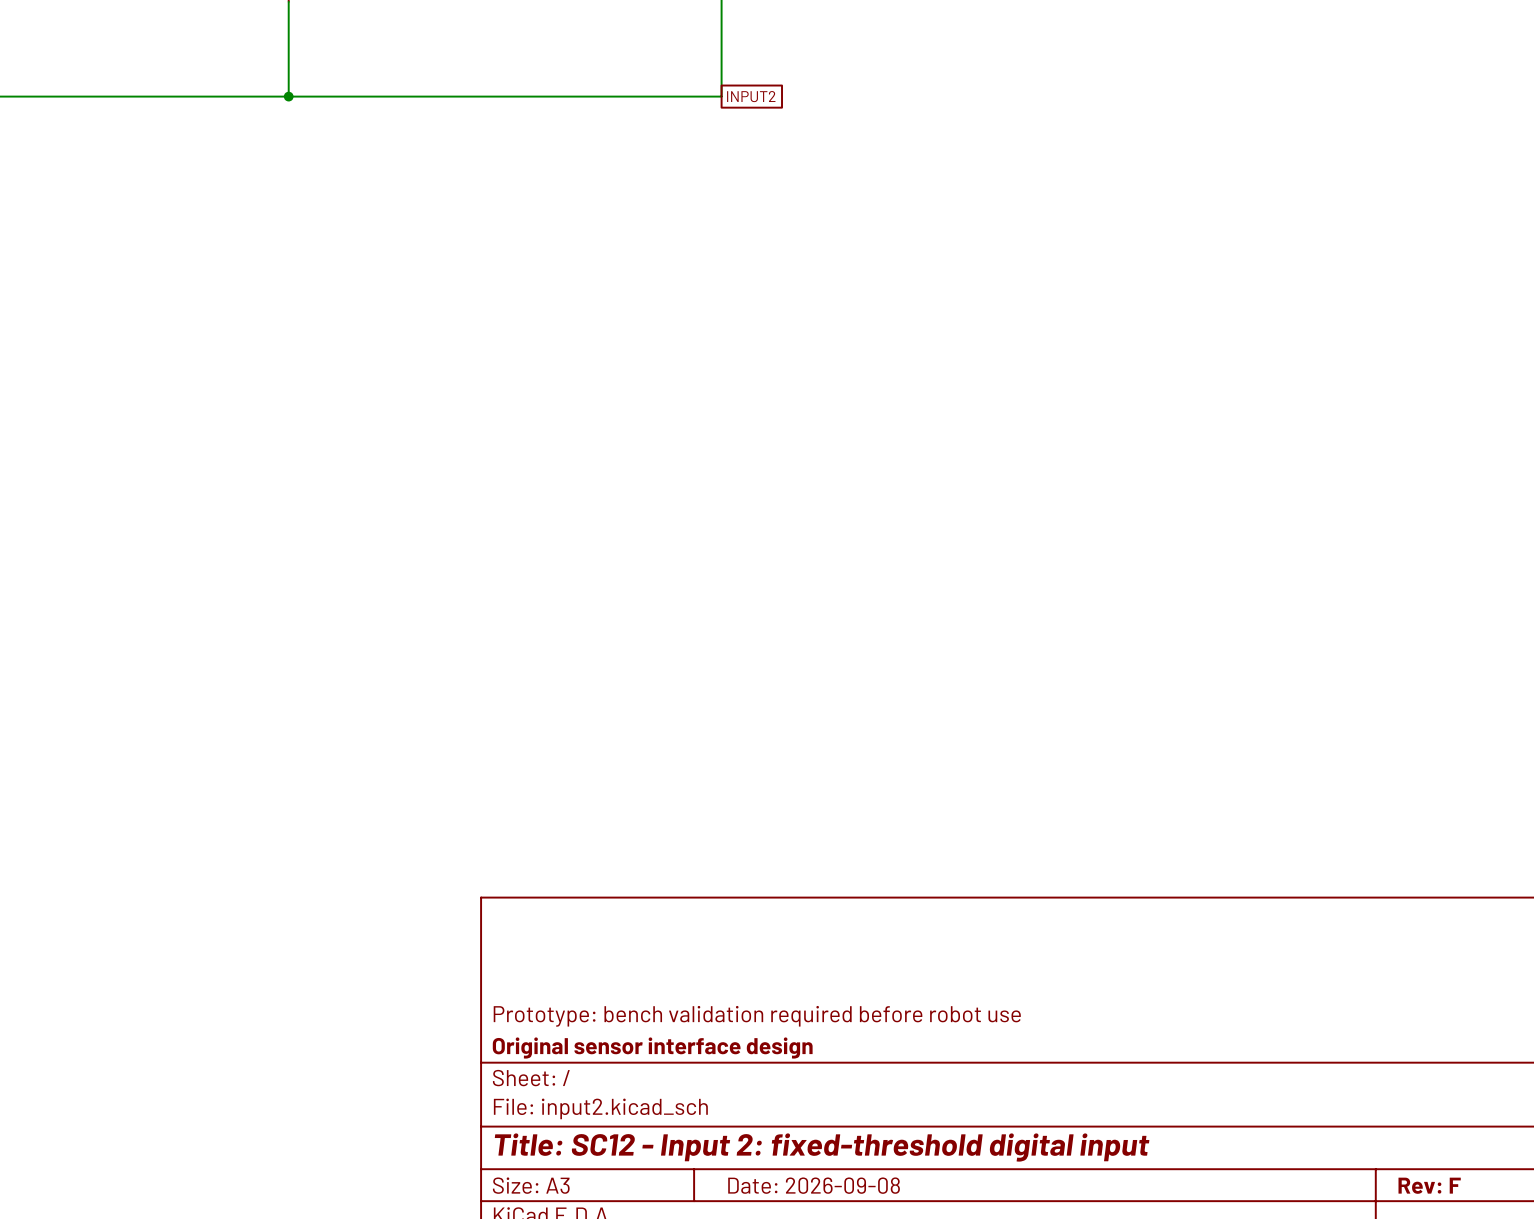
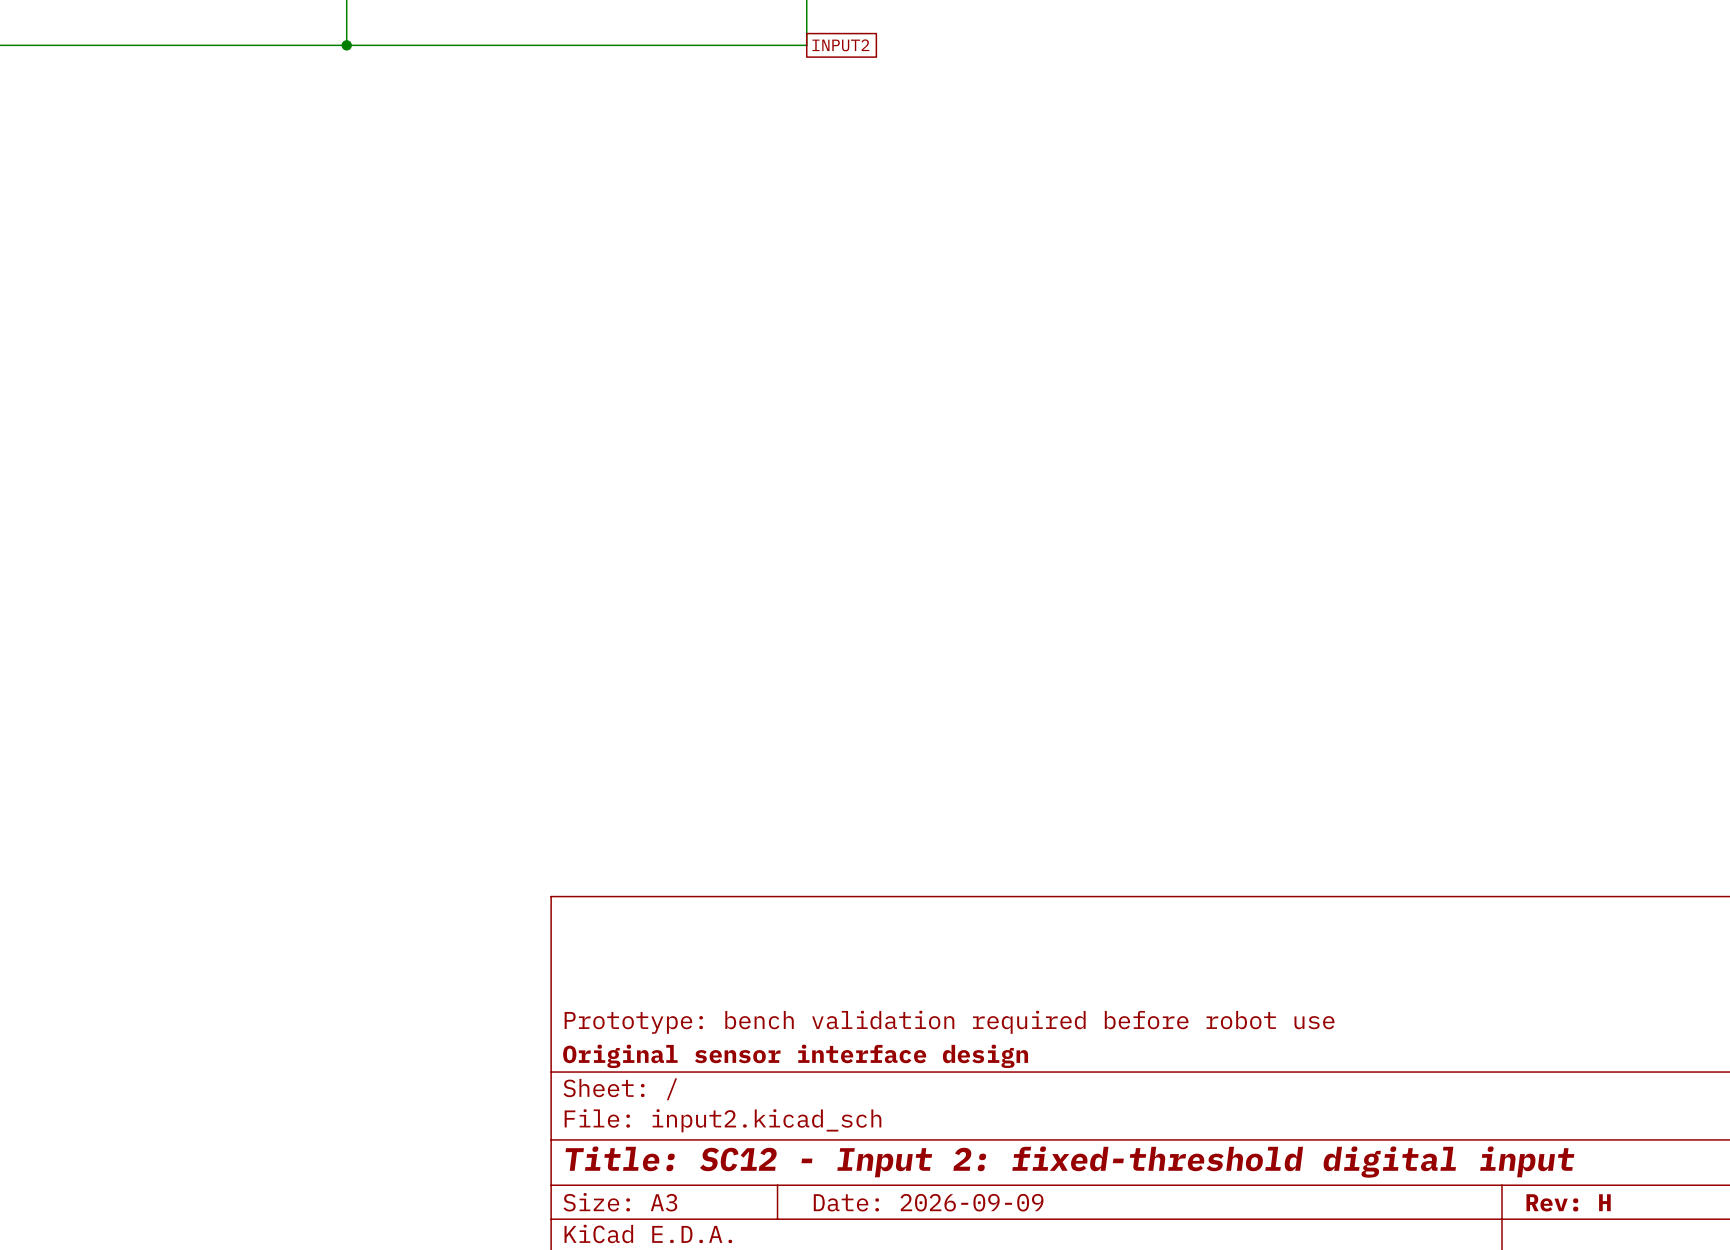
title block: Date: 2026-09-08 (814, 1185) -> Date: 2026-09-09 (928, 1202)
title block: Rev: F (1429, 1185) -> Rev: H (1568, 1202)

